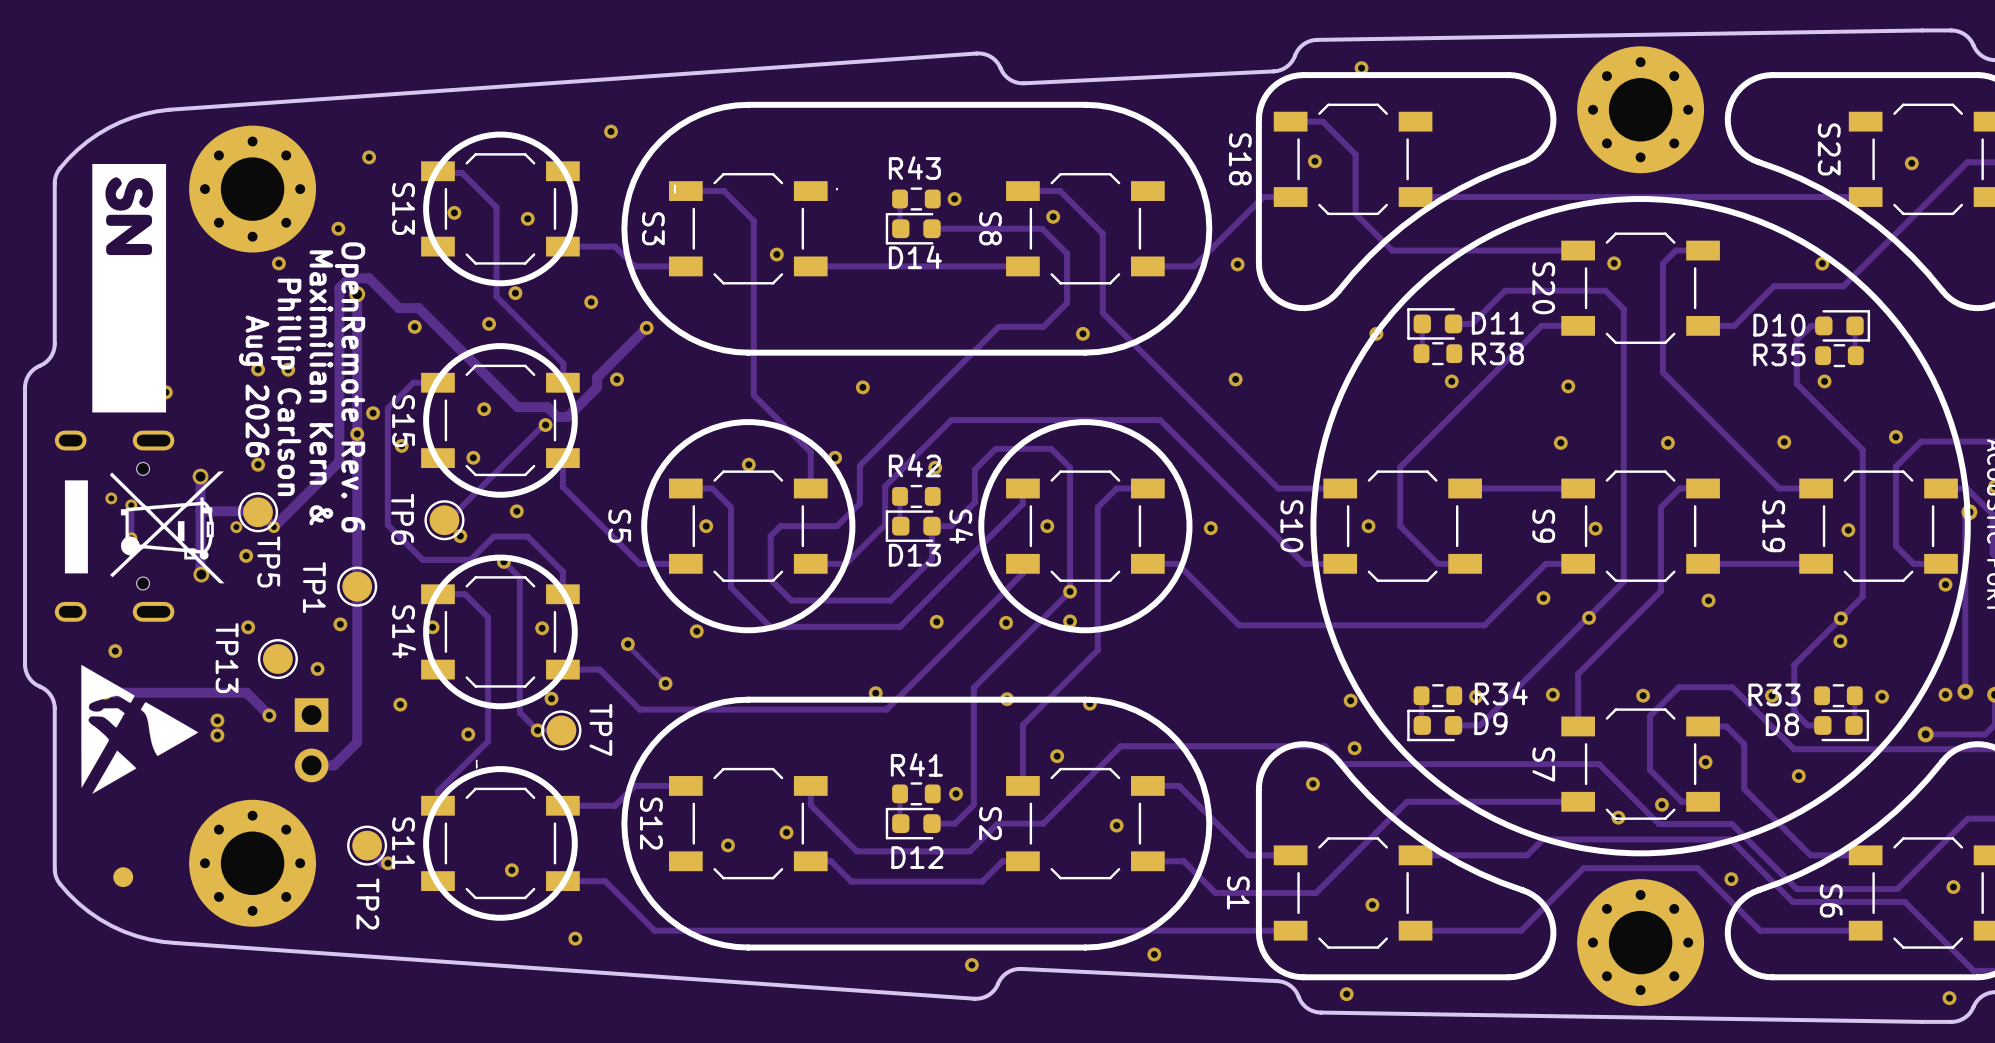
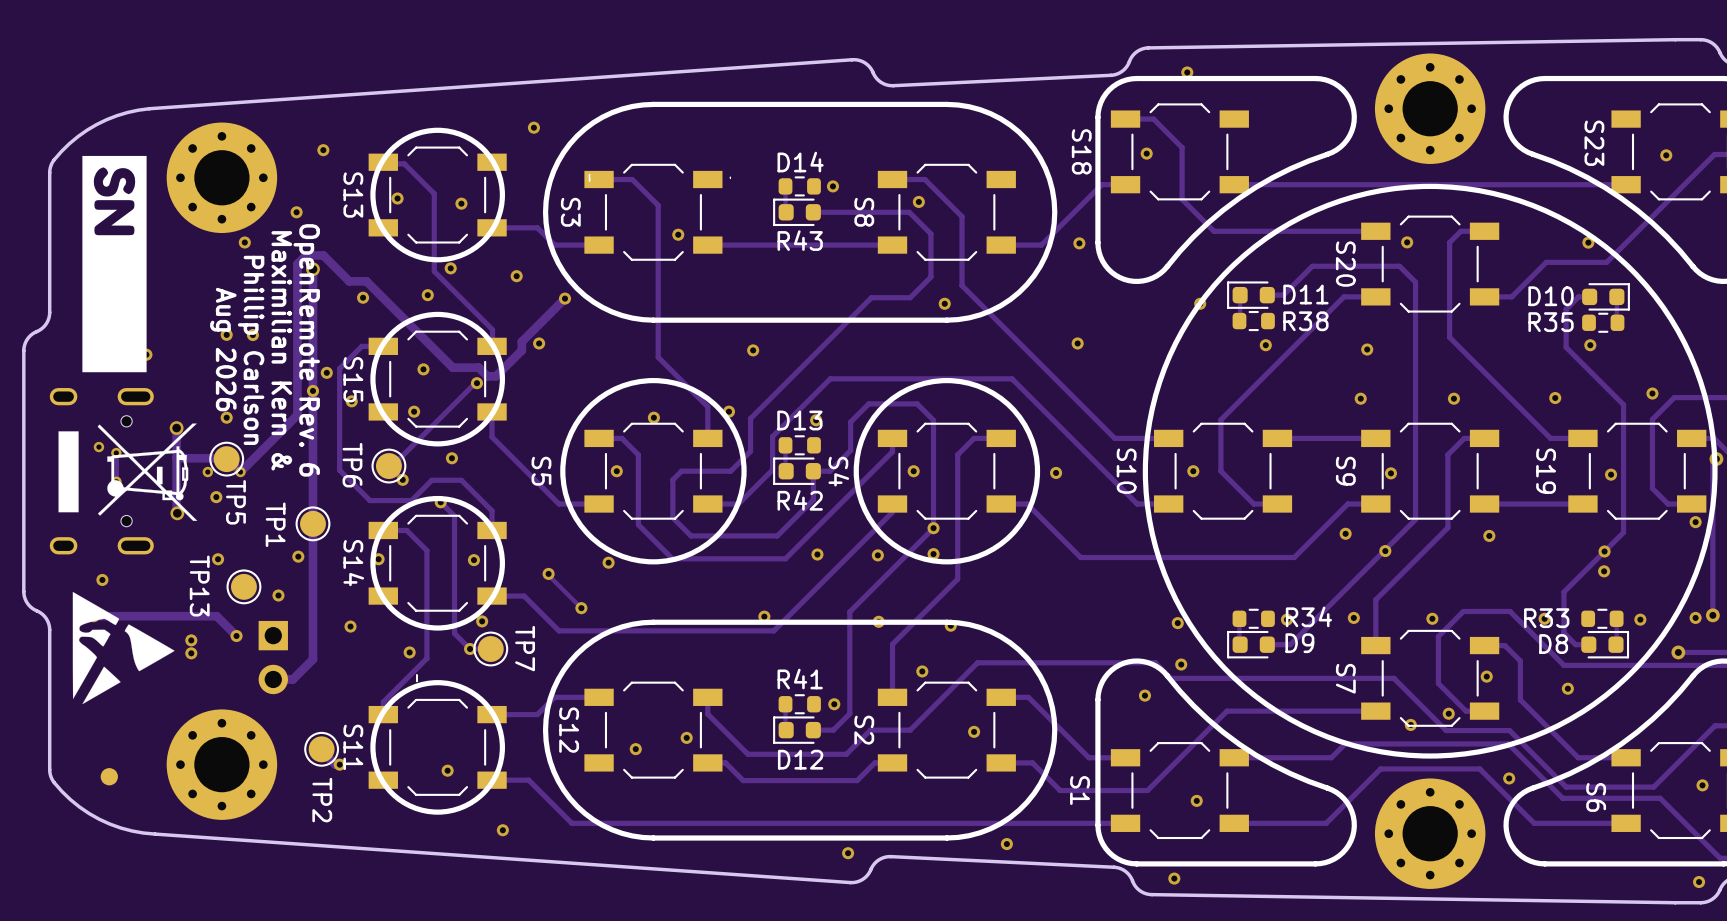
R43 name position: R43 (914, 168) -> R43 (800, 240)
D14 name position: D14 (915, 257) -> D14 (800, 162)
R42 name position: R42 (914, 465) -> R42 (800, 500)
D13 name position: D13 (914, 555) -> D13 (799, 420)

